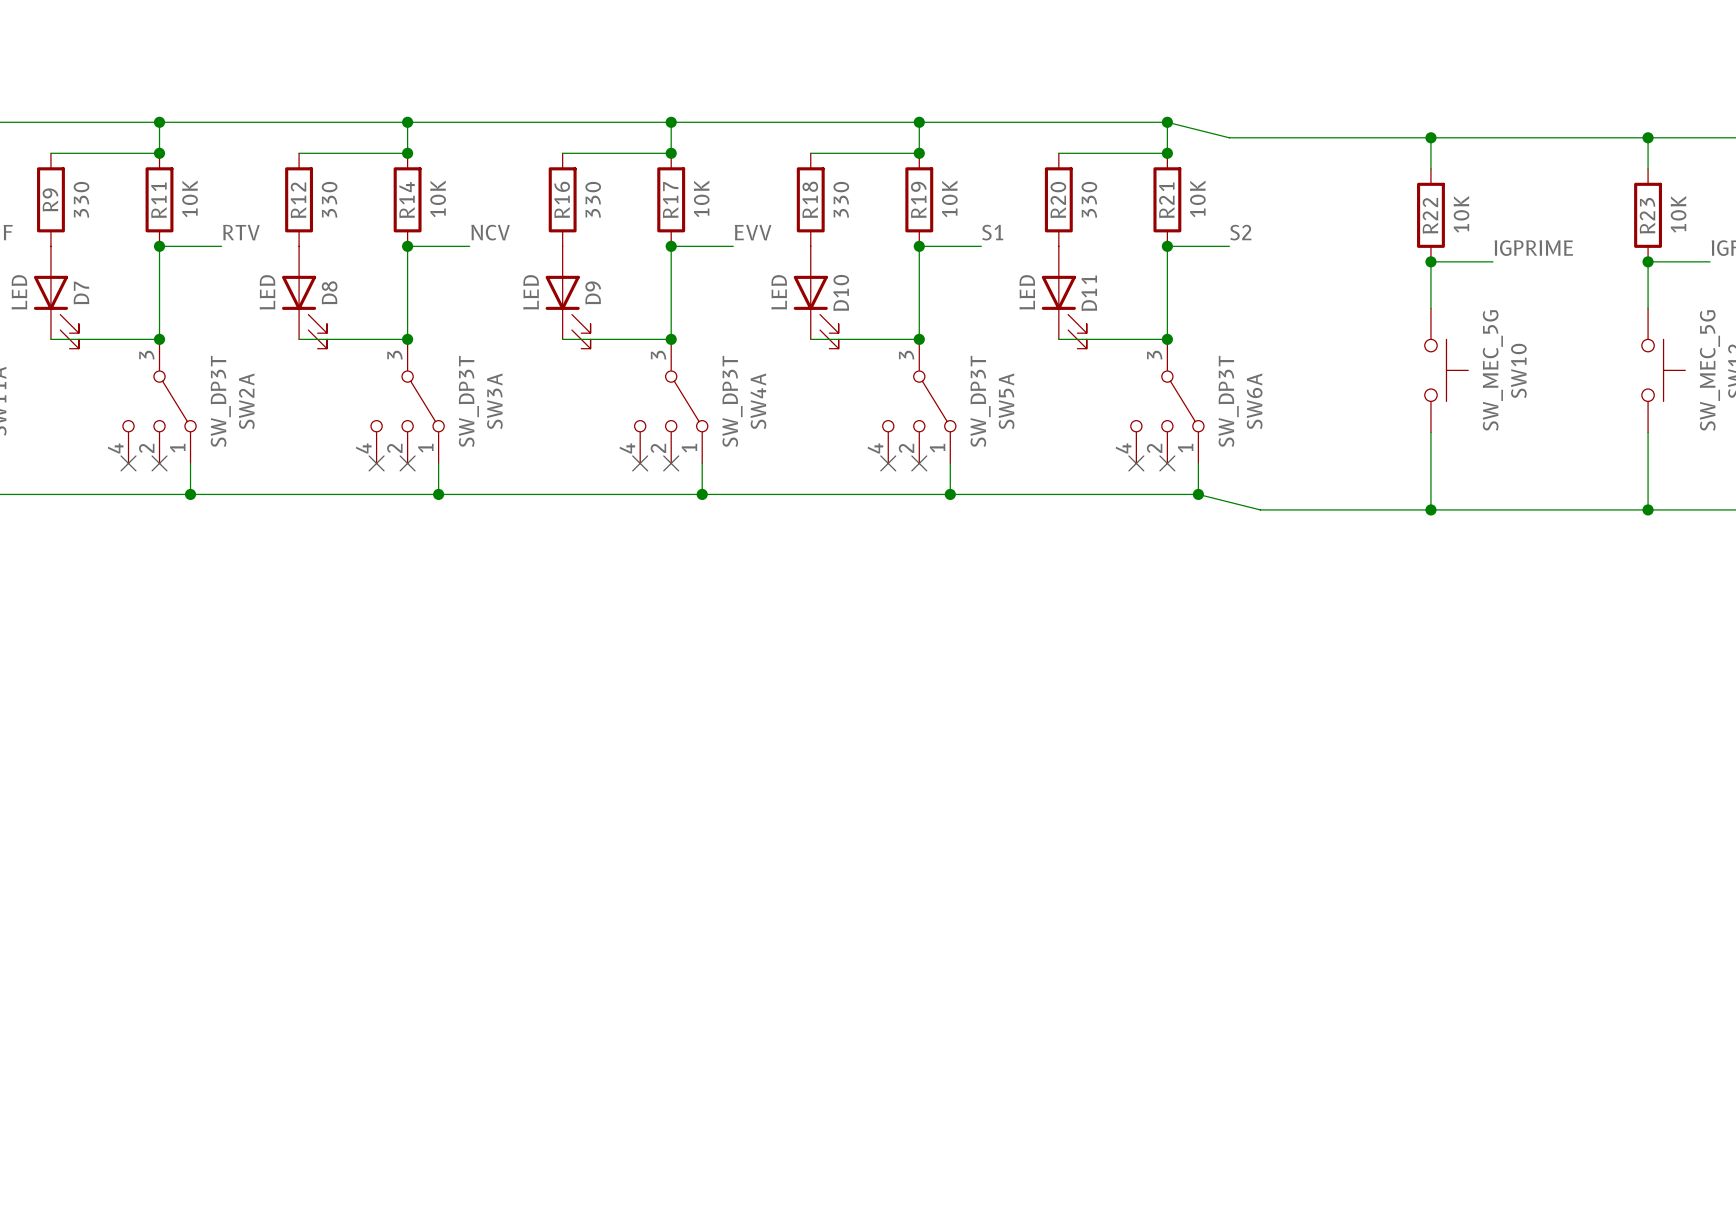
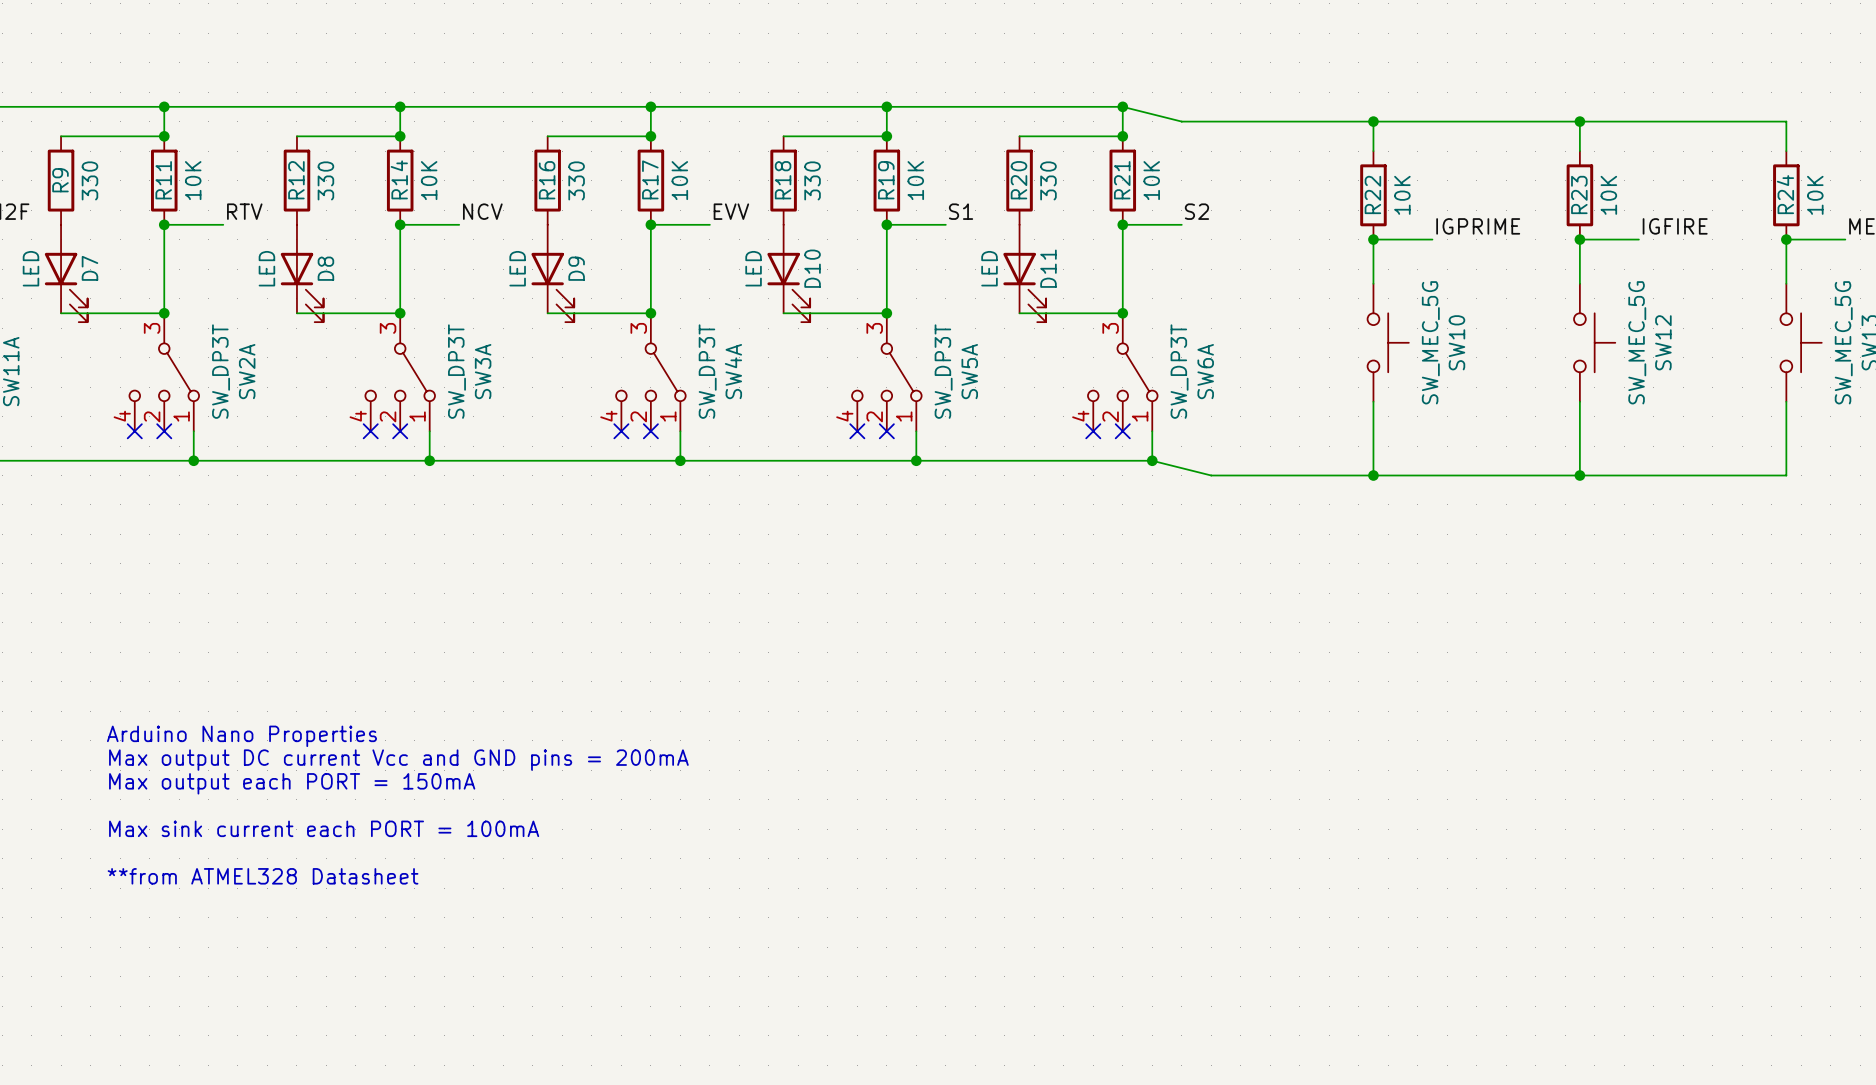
text: none -> Arduino Nano Properties (241, 736)
text: none -> Max output DC current Vcc and GND pins = 200mA (398, 760)
text: none -> Max output each PORT = 150mA (292, 783)
text: none -> Max sink current each PORT = 100mA (324, 828)
text: none -> **from ATMEL328 Datasheet (263, 876)

